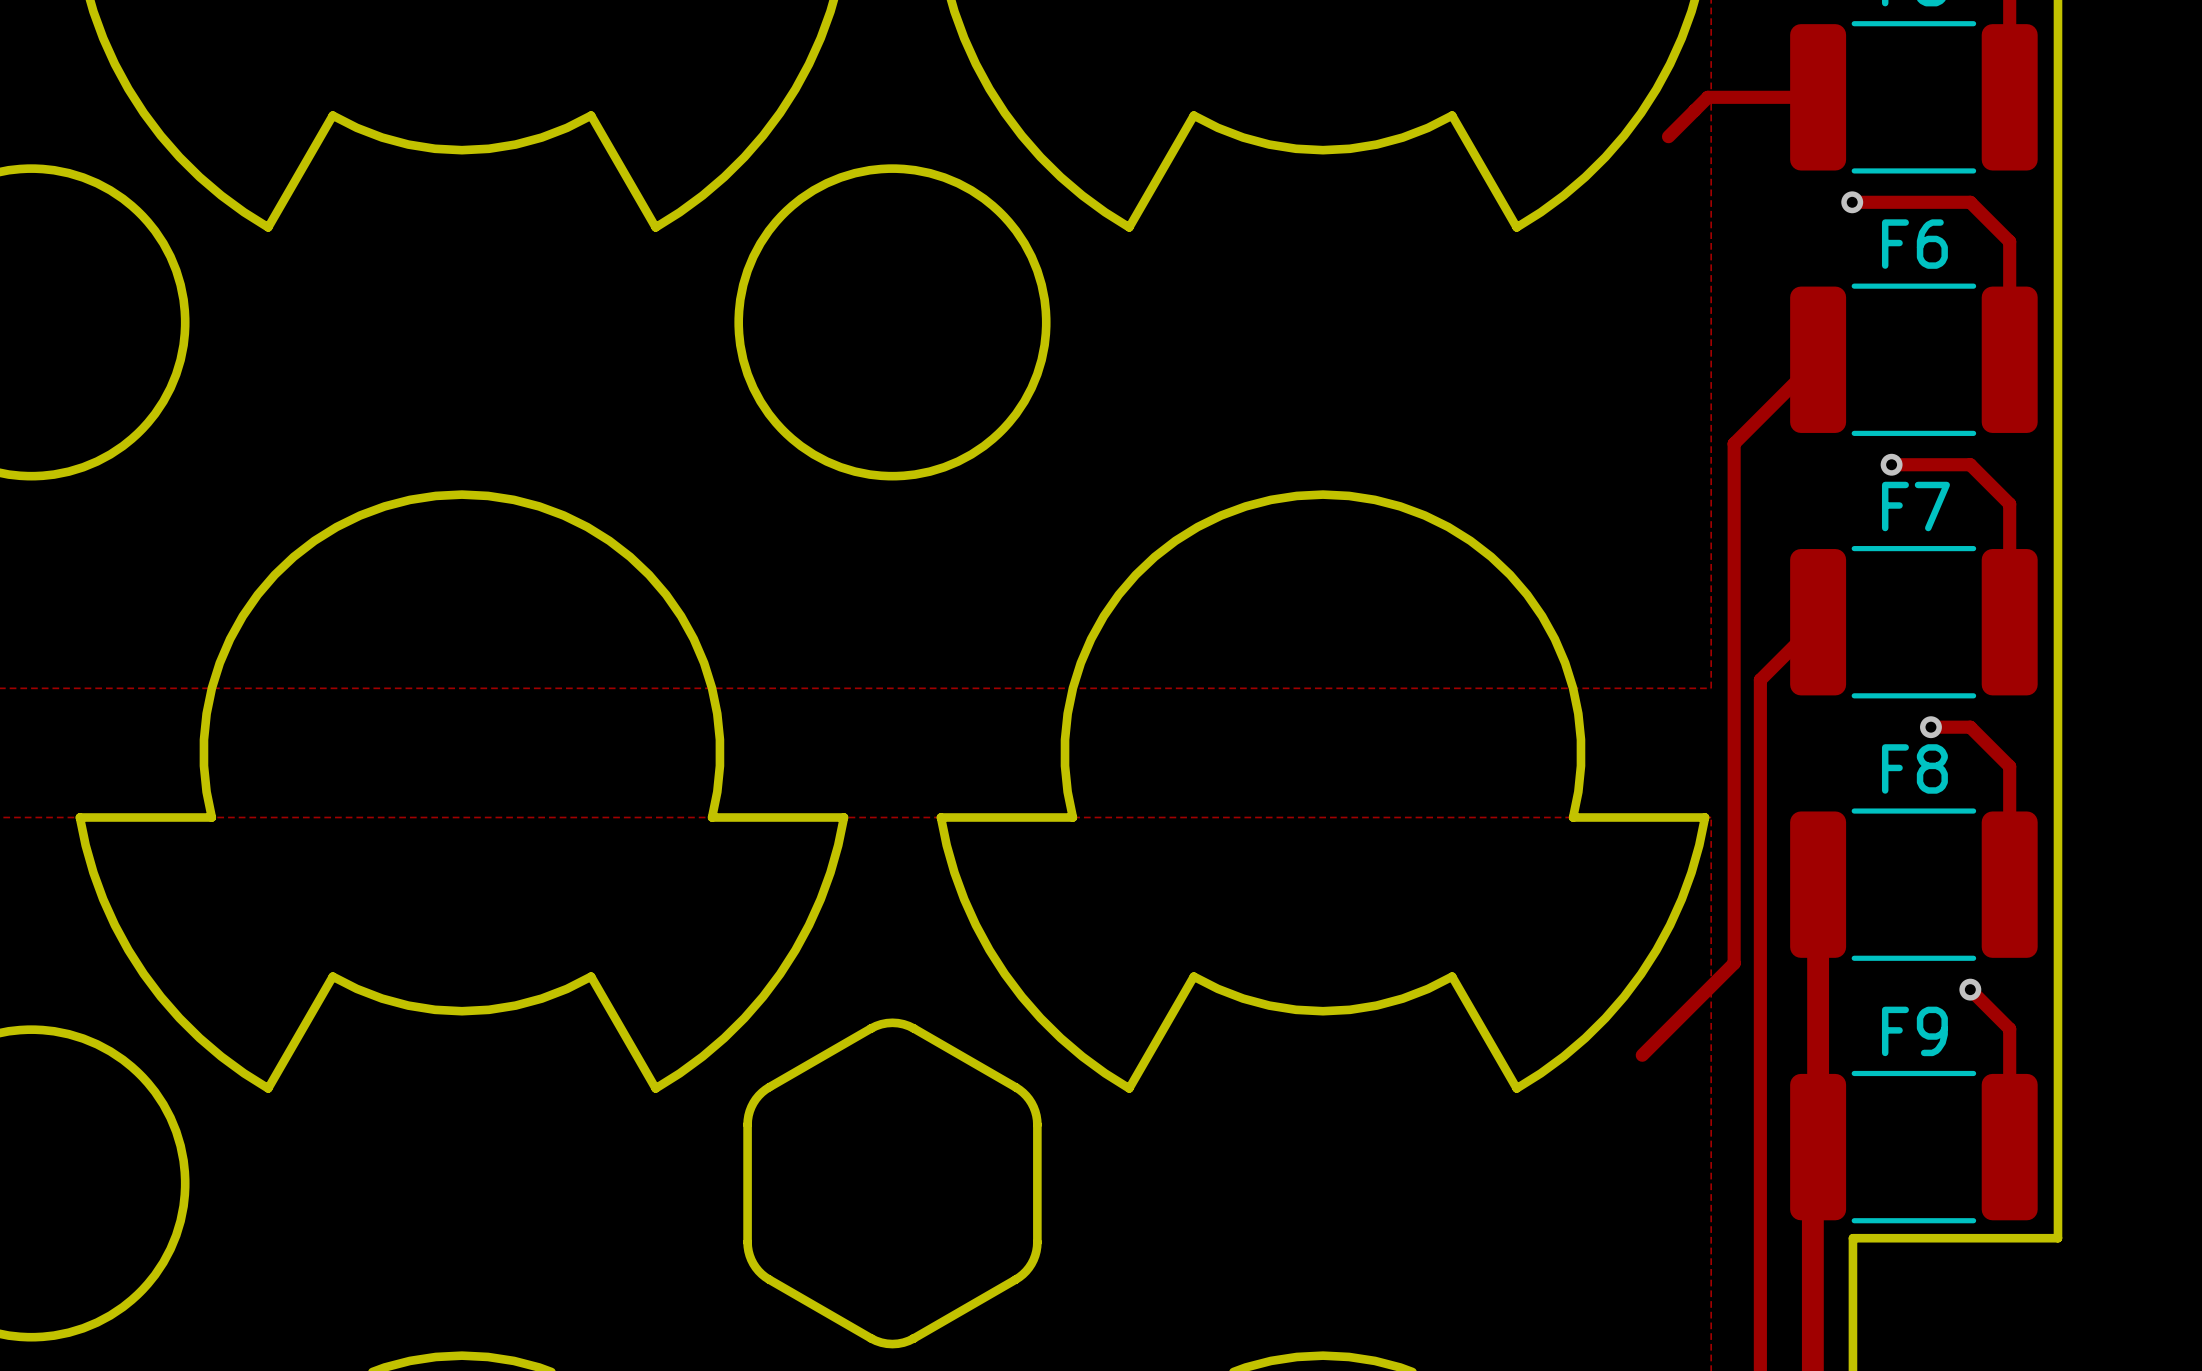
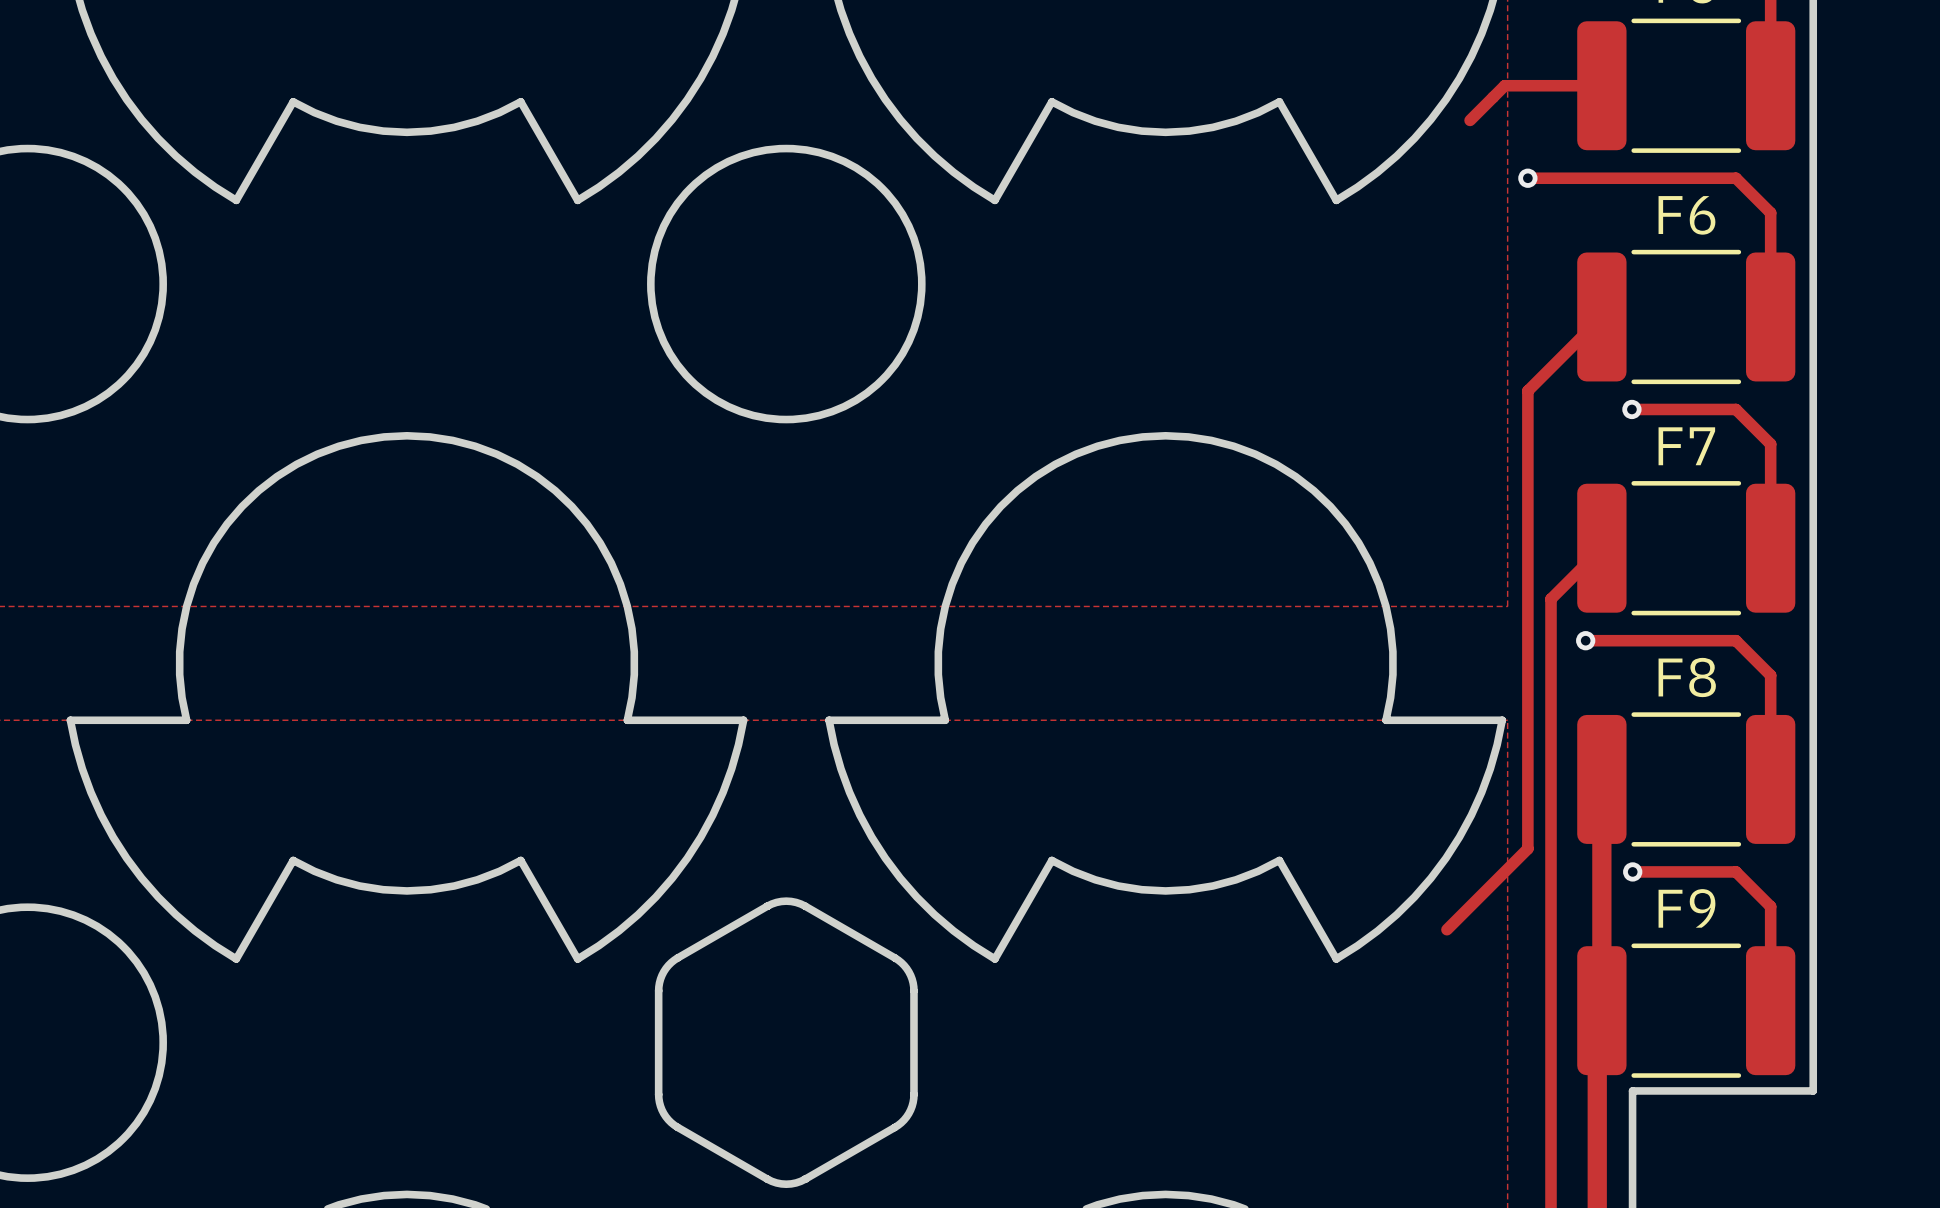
track: none -> (1527, 178) (1631, 178)
via position: (1852, 202) -> (1527, 178)
track: none -> (1631, 409) (1666, 409)
via position: (1891, 464) -> (1631, 409)
track: none -> (1585, 640) (1701, 640)
via position: (1930, 727) -> (1585, 640)
track: none -> (1632, 871) (1735, 871)
via position: (1970, 989) -> (1632, 871)

